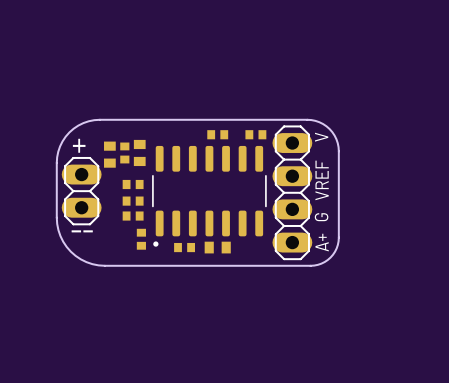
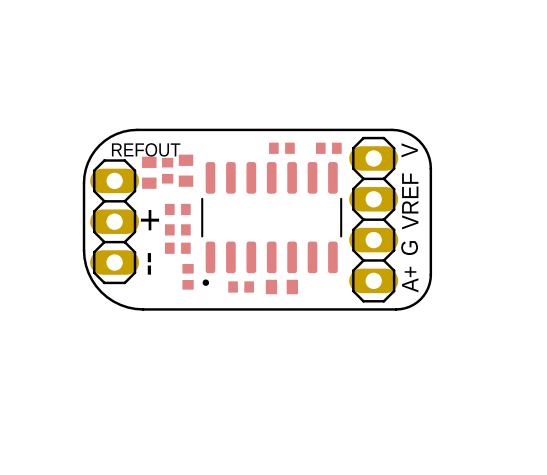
text: none -> REFOUT (146, 149)
text position: + (79, 145) -> + (150, 220)
part footprint: [61, 156, 102, 226] -> [90, 159, 140, 285]
text rotation: 0° (82, 231) -> 90° counterclockwise (149, 263)

